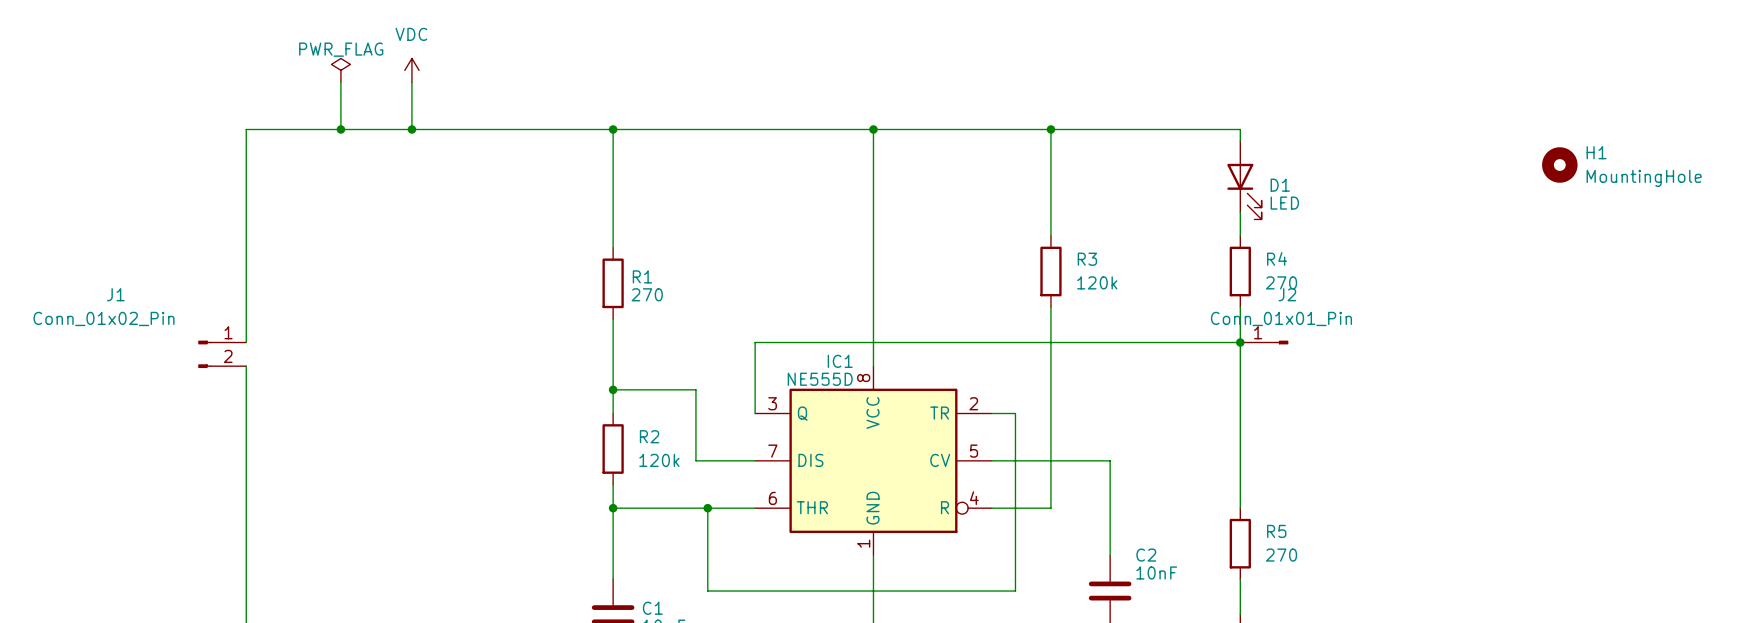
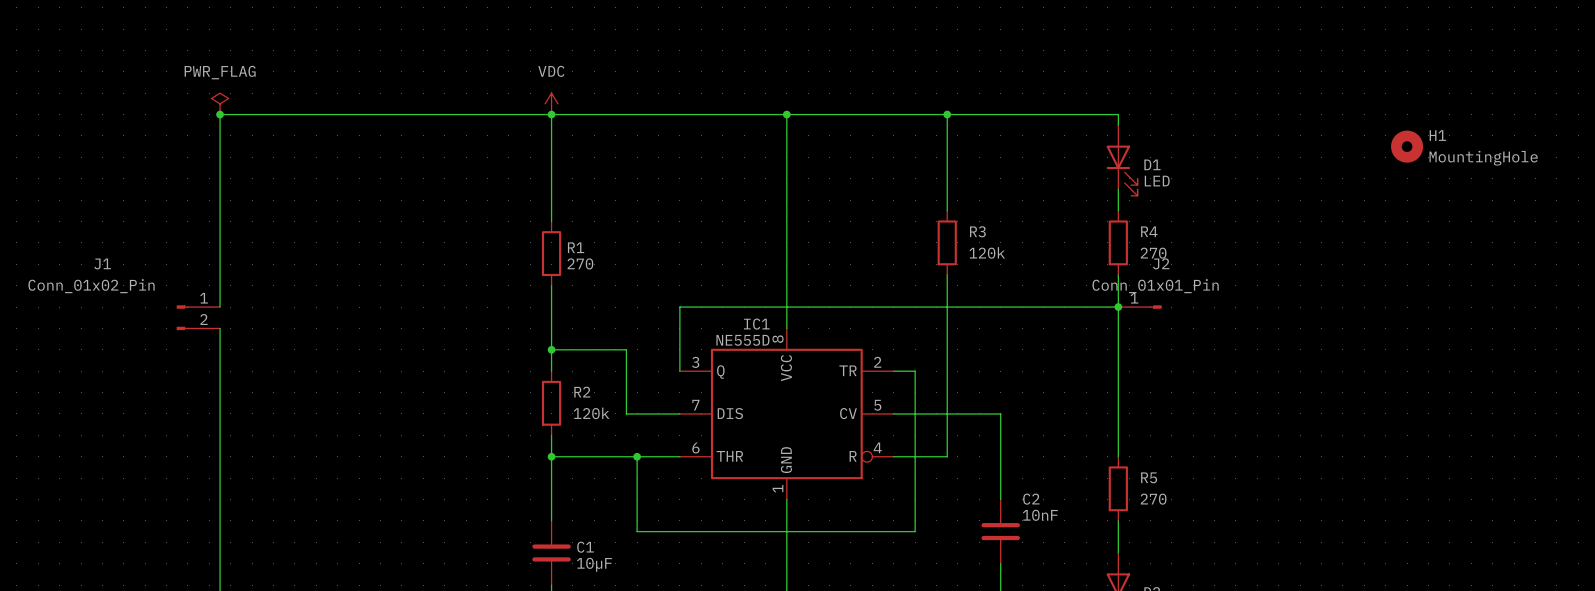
power symbol text position: PWR_FLAG (341, 49) -> PWR_FLAG (220, 72)
power symbol position: PWR_FLAG (340, 70) -> PWR_FLAG (220, 103)
power symbol position: VDC (411, 70) -> VDC (551, 103)
wire: (340, 82) (340, 129) -> none
wire: (411, 82) (411, 129) -> none
junction: none -> (220, 114)
junction: (340, 129) -> none
junction: (411, 129) -> none

